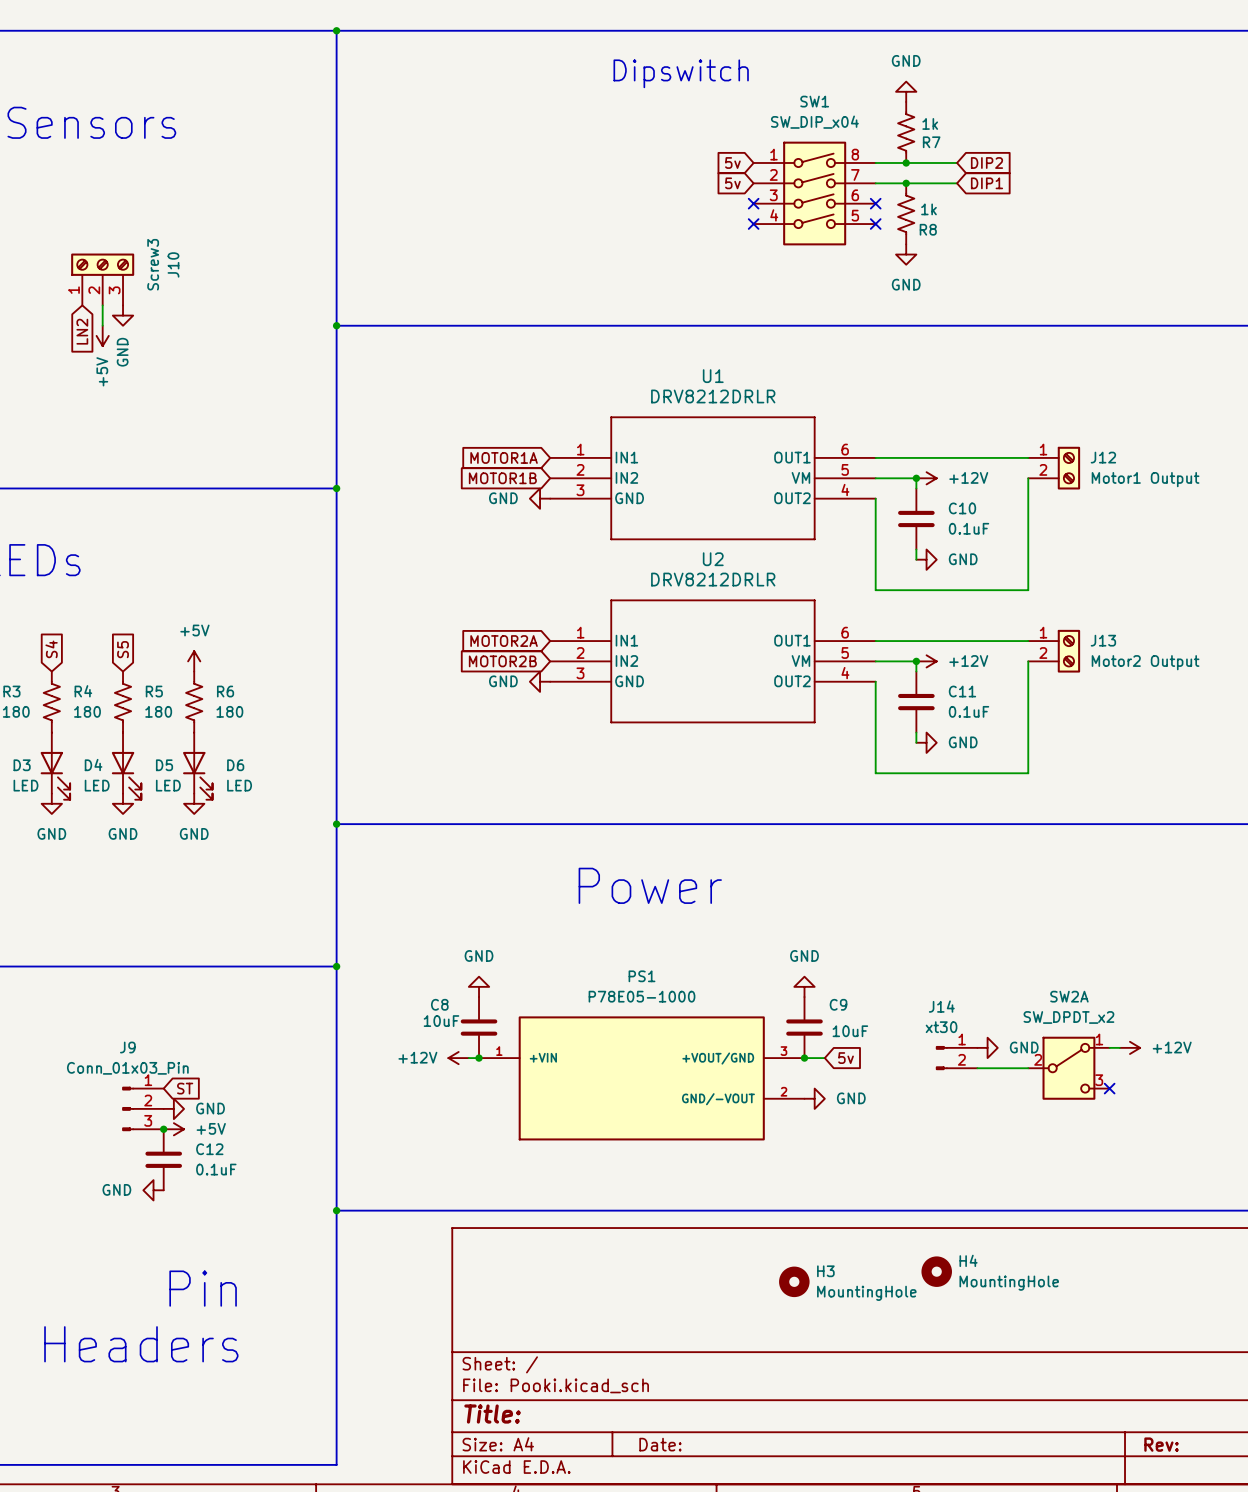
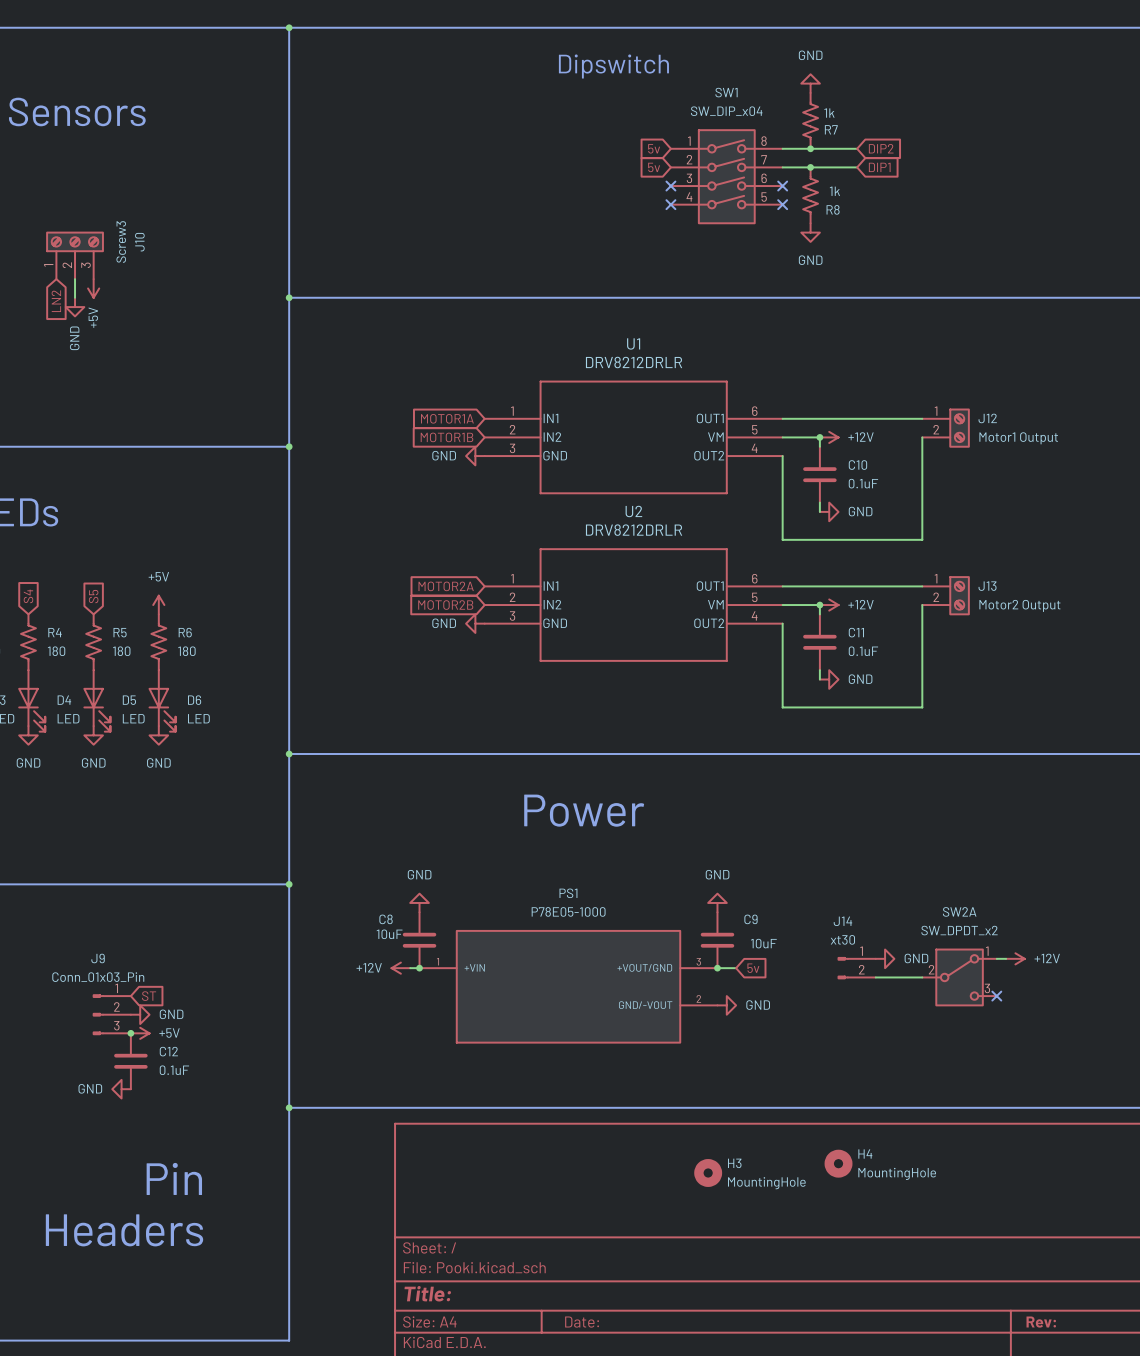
power symbol: GND (123, 315) -> +5V (93, 288)
power symbol: +5V (102, 335) -> GND (75, 307)

